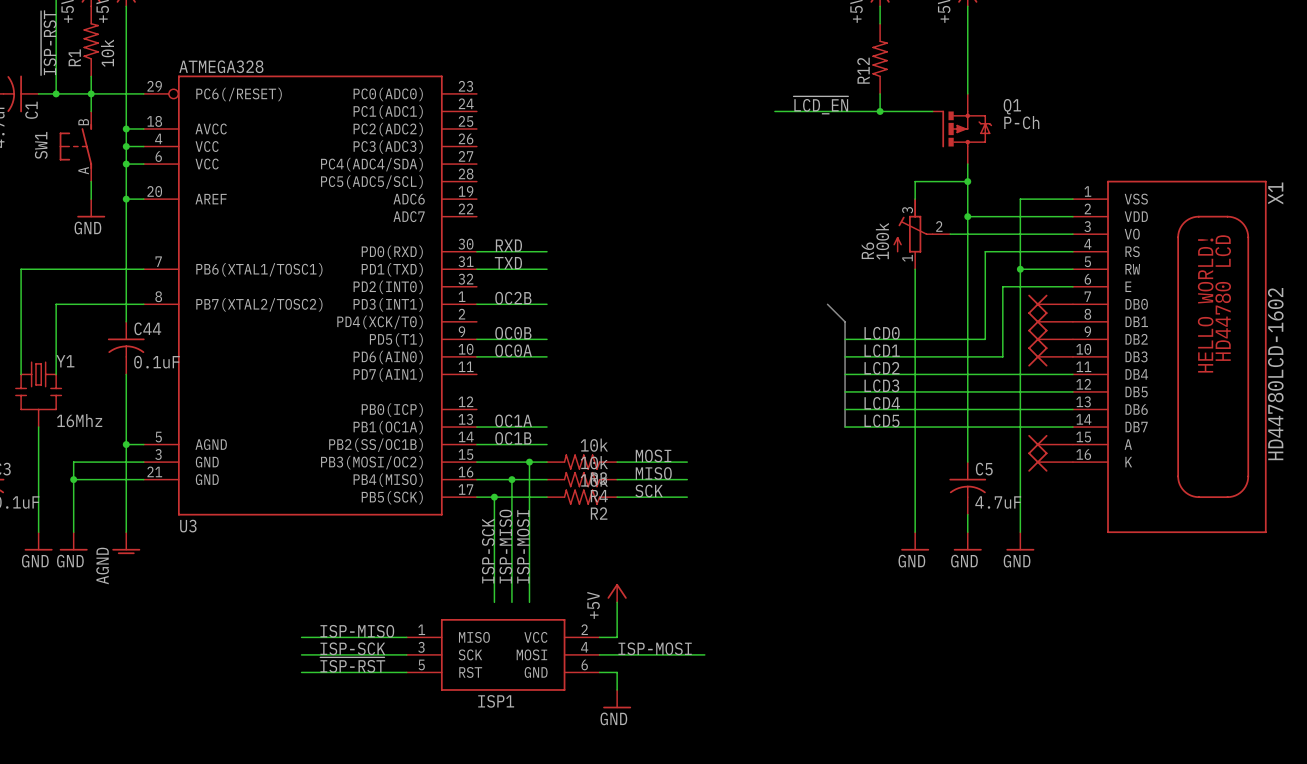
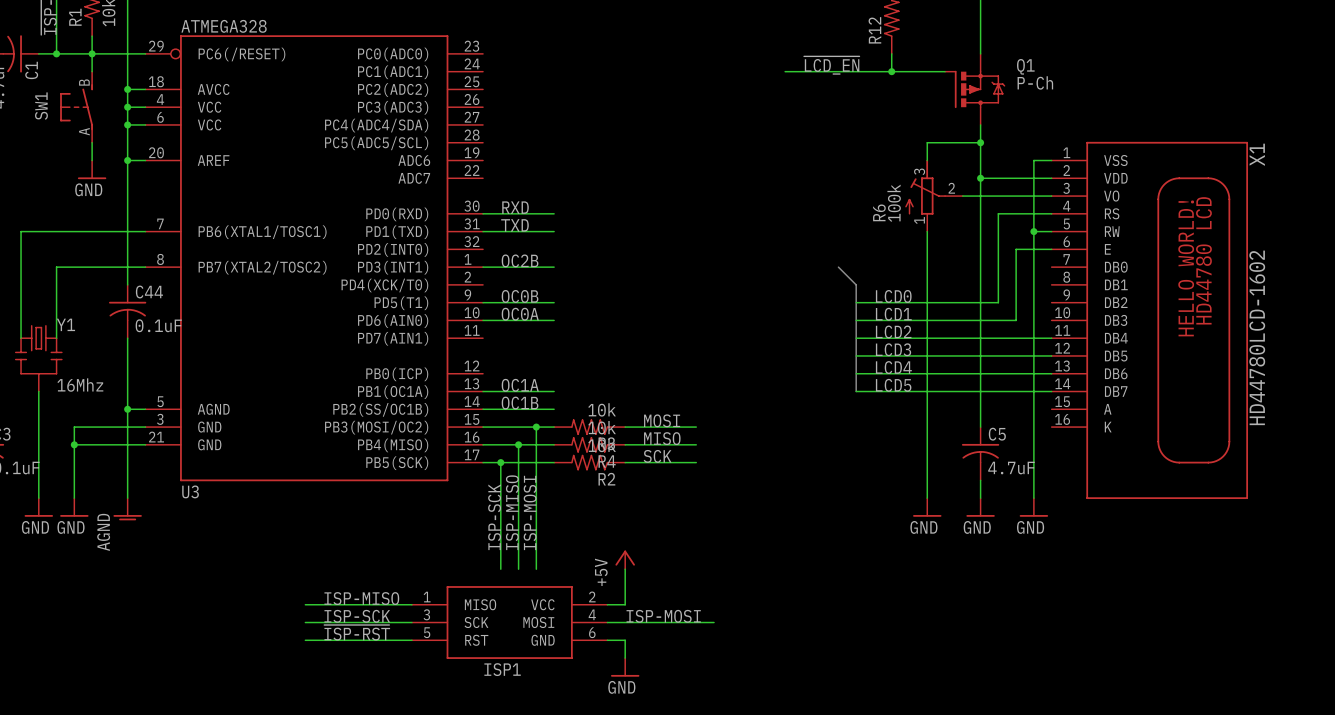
part: (1050, 304) -> none
part: (1050, 321) -> none
part: (1050, 339) -> none
part: (1050, 356) -> none
X1 position: (1169, 356) -> (1149, 320)
part: (1050, 444) -> none
part: (1050, 462) -> none

